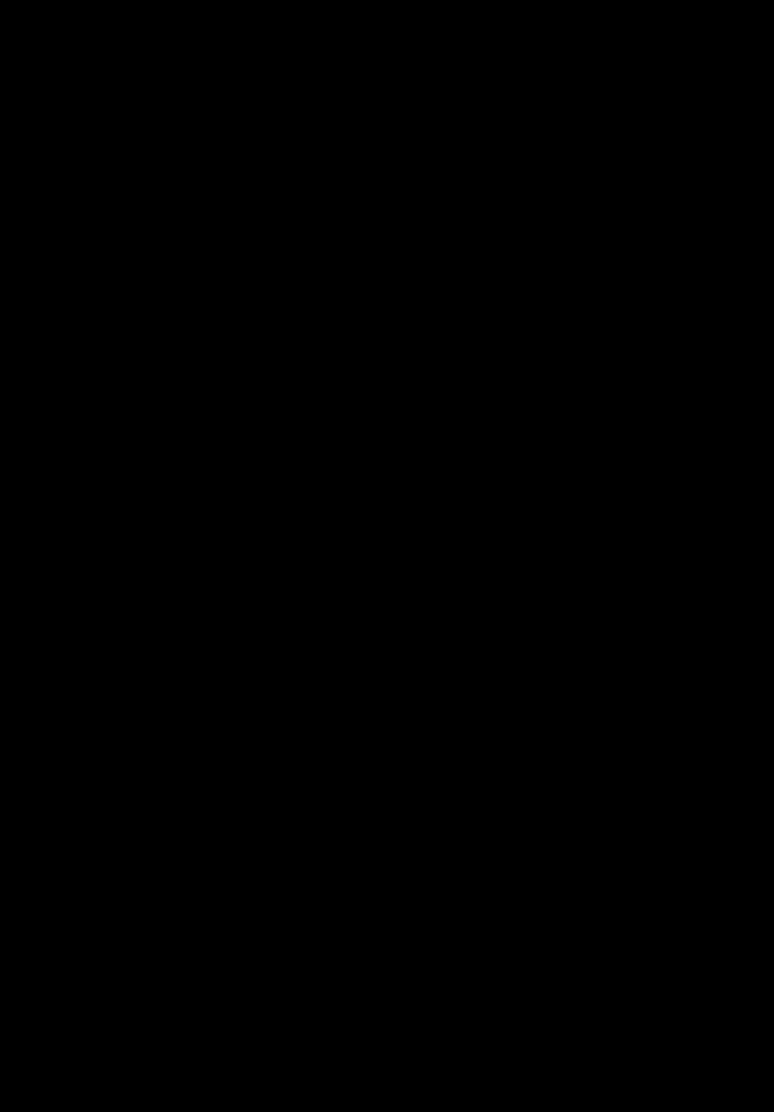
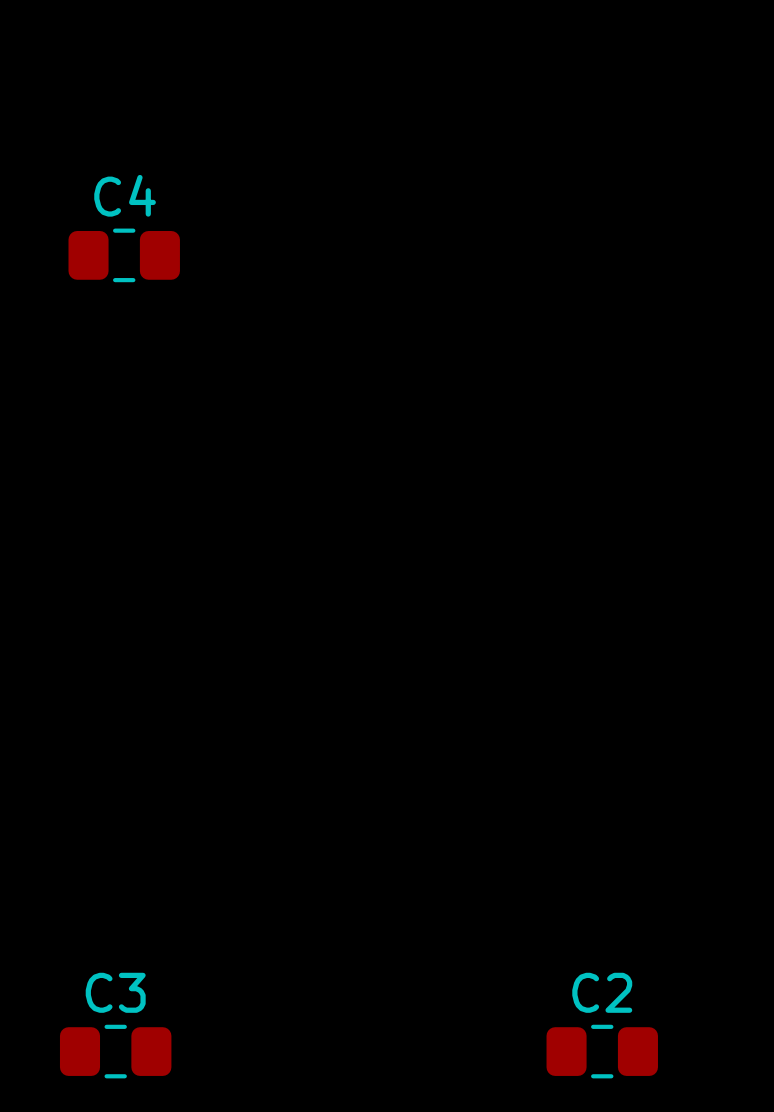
C4: none -> (124, 255)
C3: none -> (115, 1051)
C2: none -> (602, 1051)

